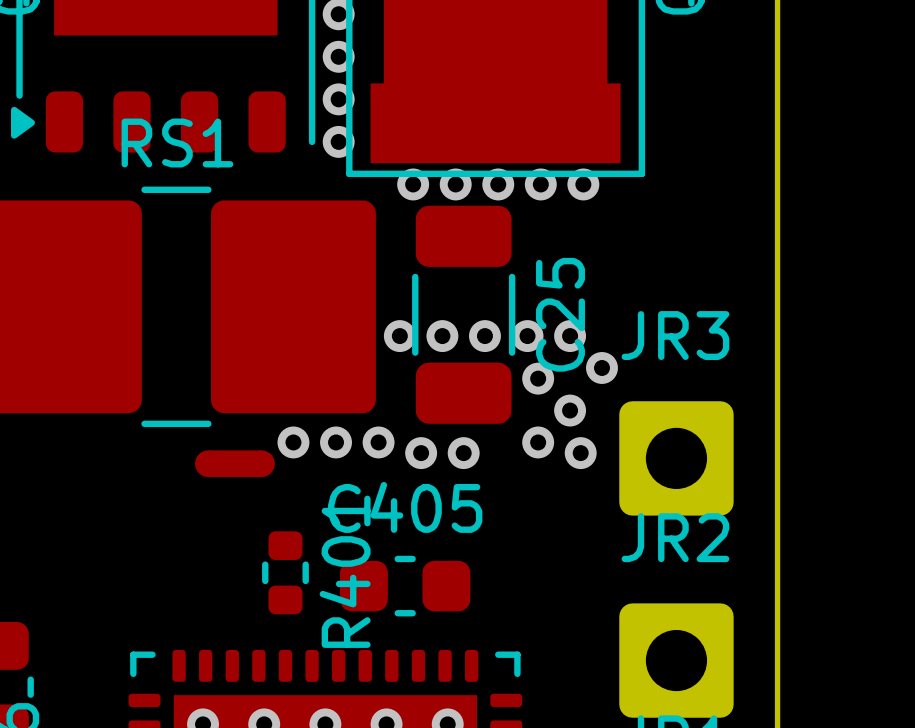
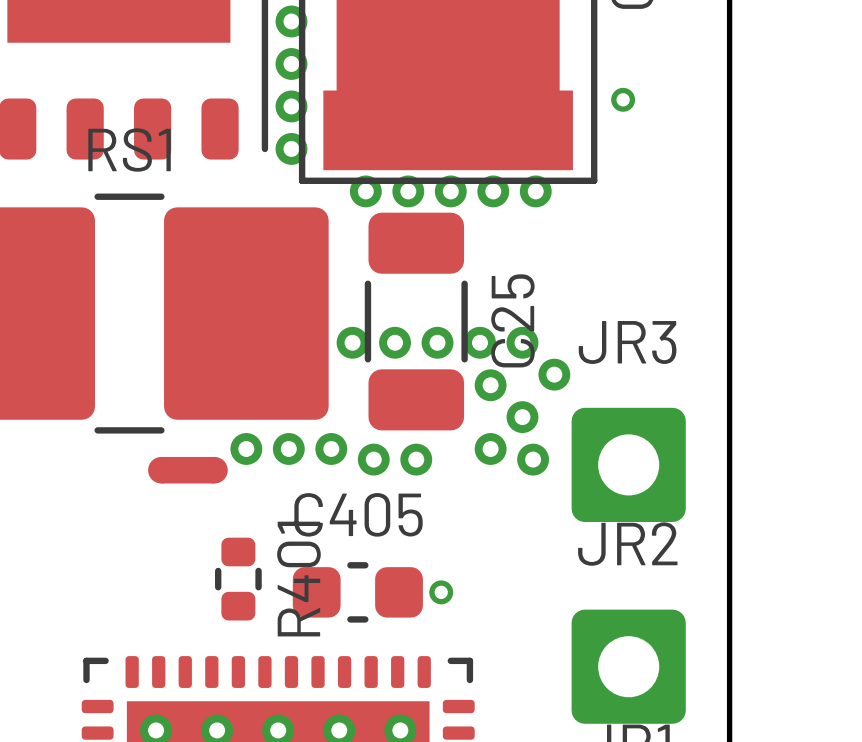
via: none -> (623, 99)
via: none -> (441, 592)

